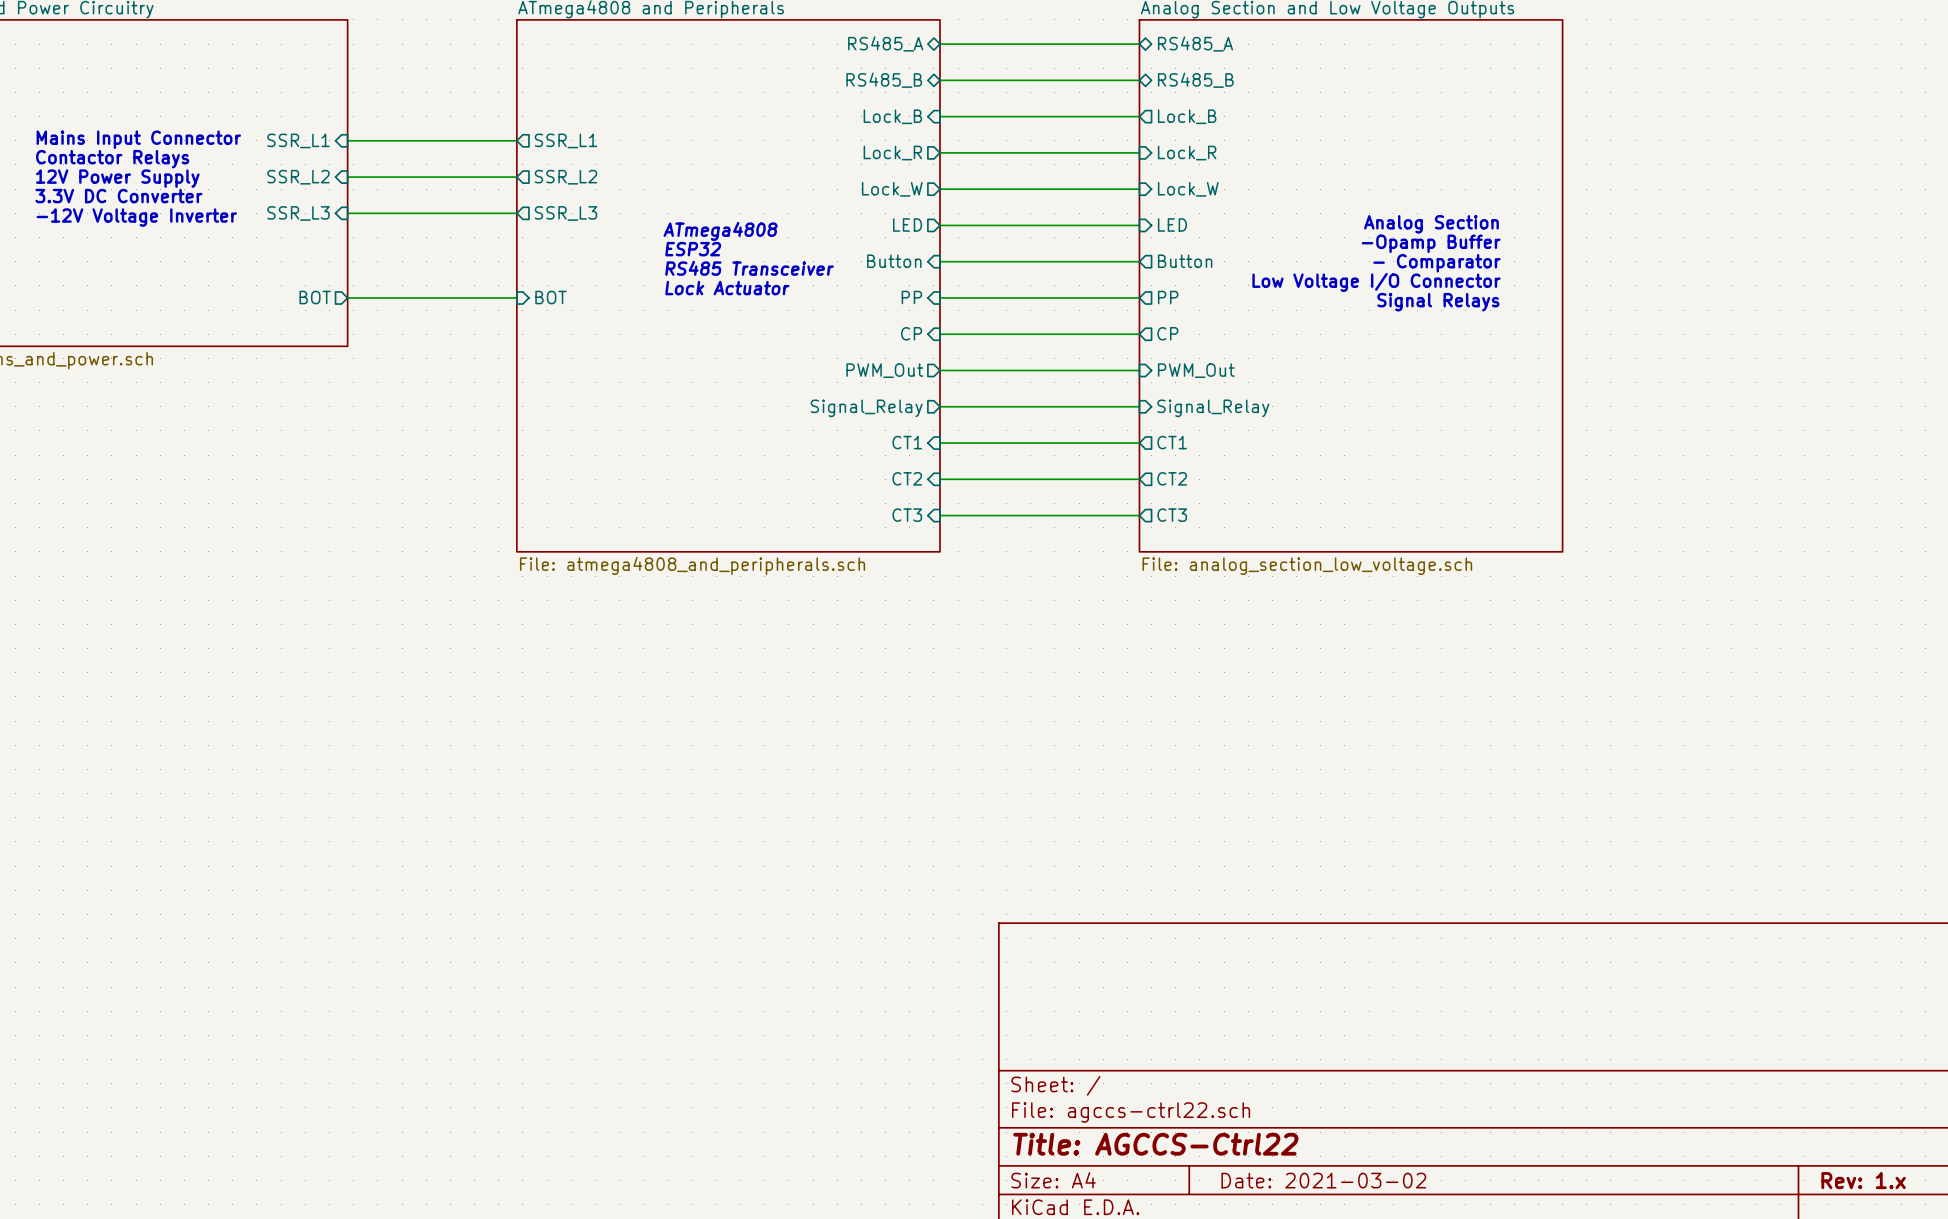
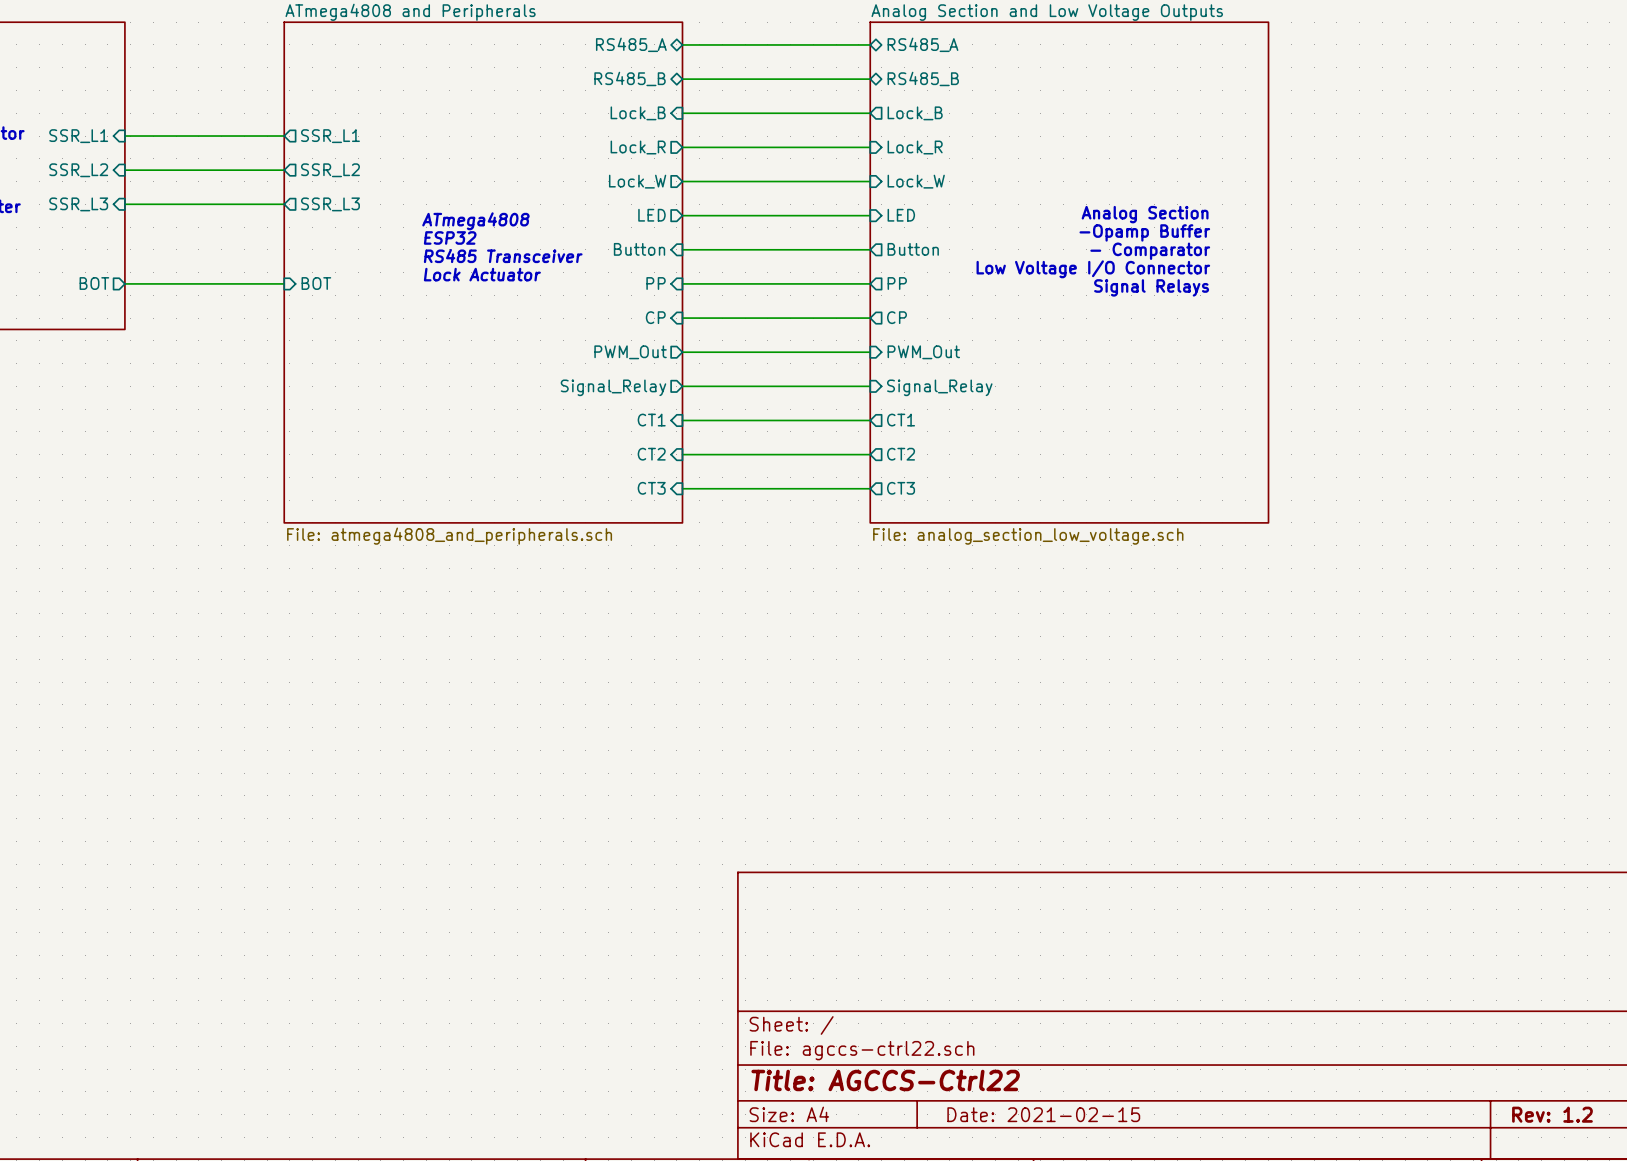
title block: Date: 2021-03-02 (1323, 1180) -> Date: 2021-02-15 (1043, 1114)
title block: Rev: 1.x (1863, 1180) -> Rev: 1.2 (1552, 1114)

